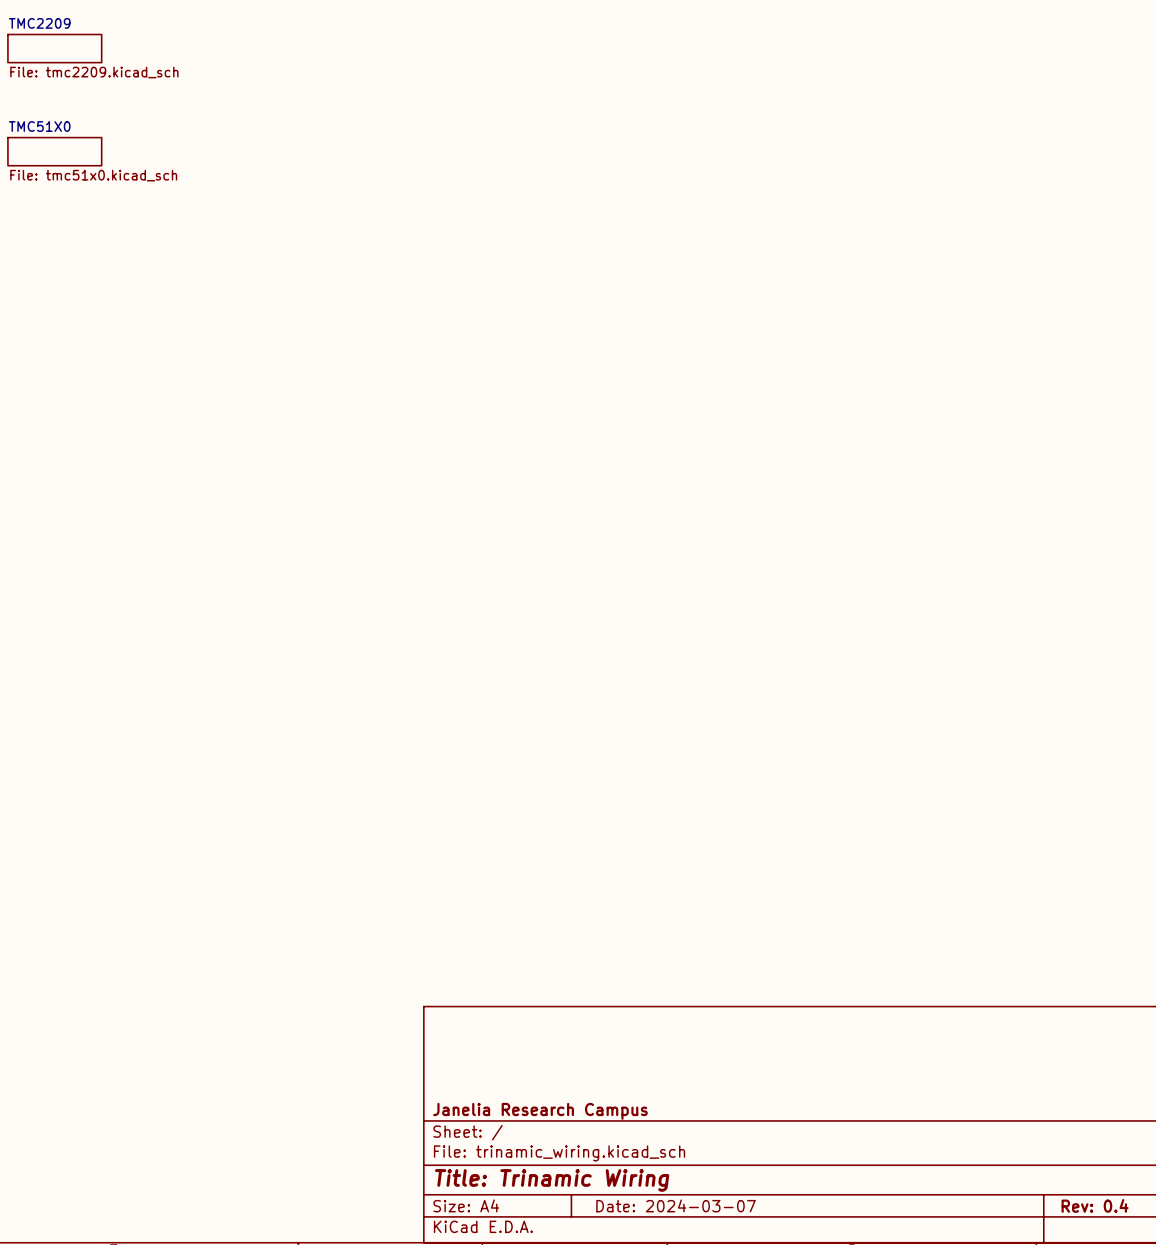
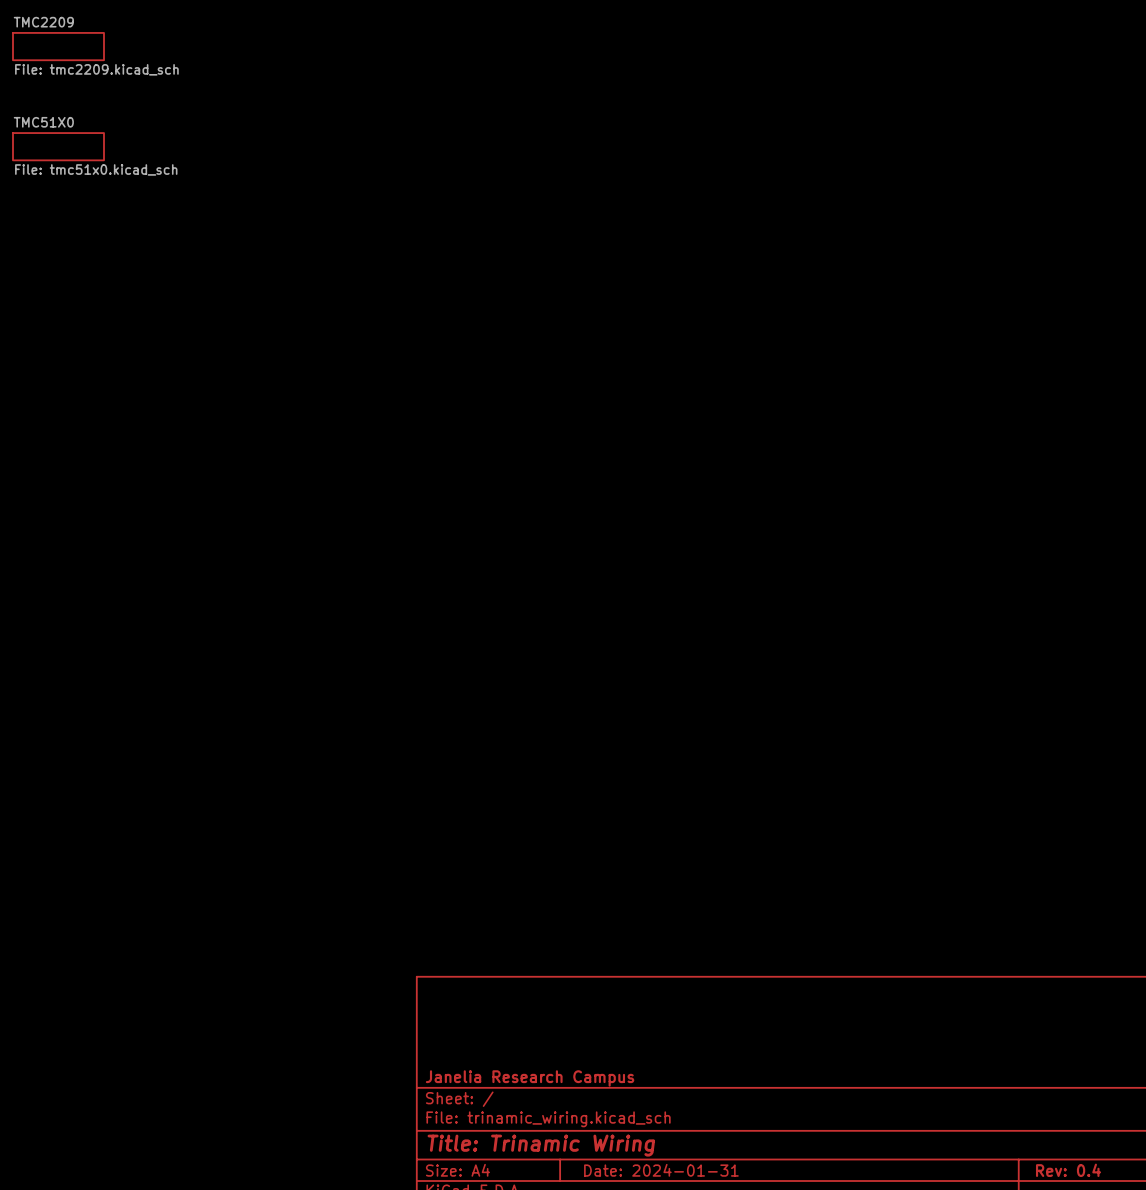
title block: Date: 2024-03-07 (676, 1205) -> Date: 2024-01-31 (661, 1170)

